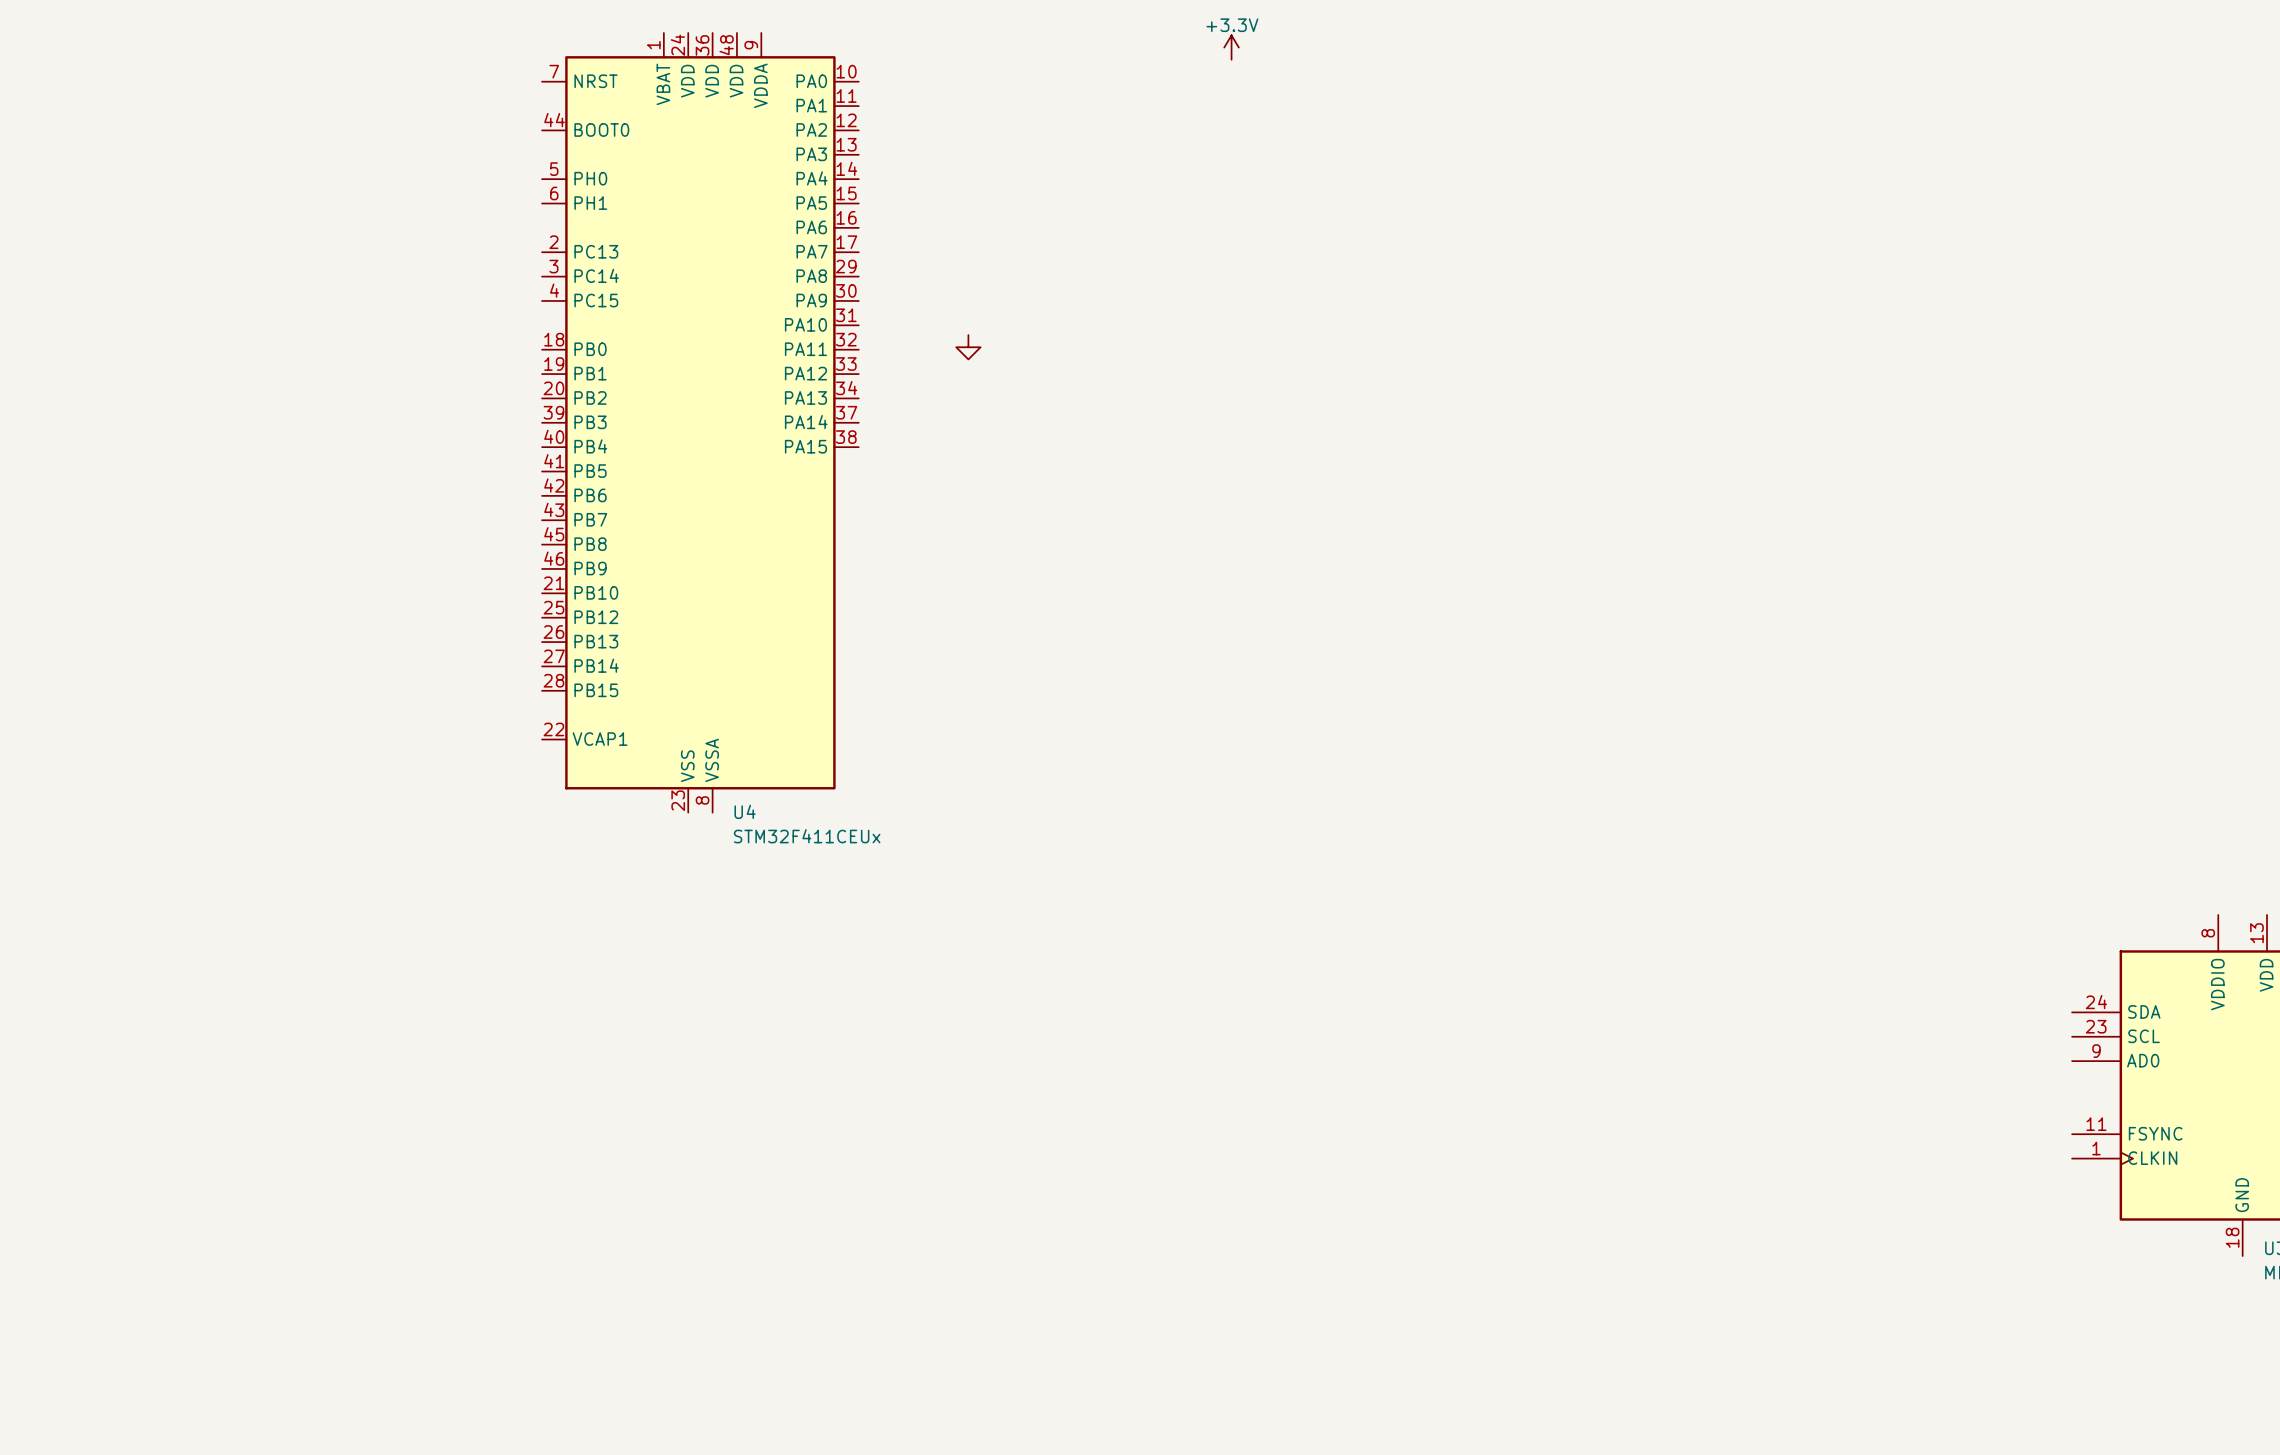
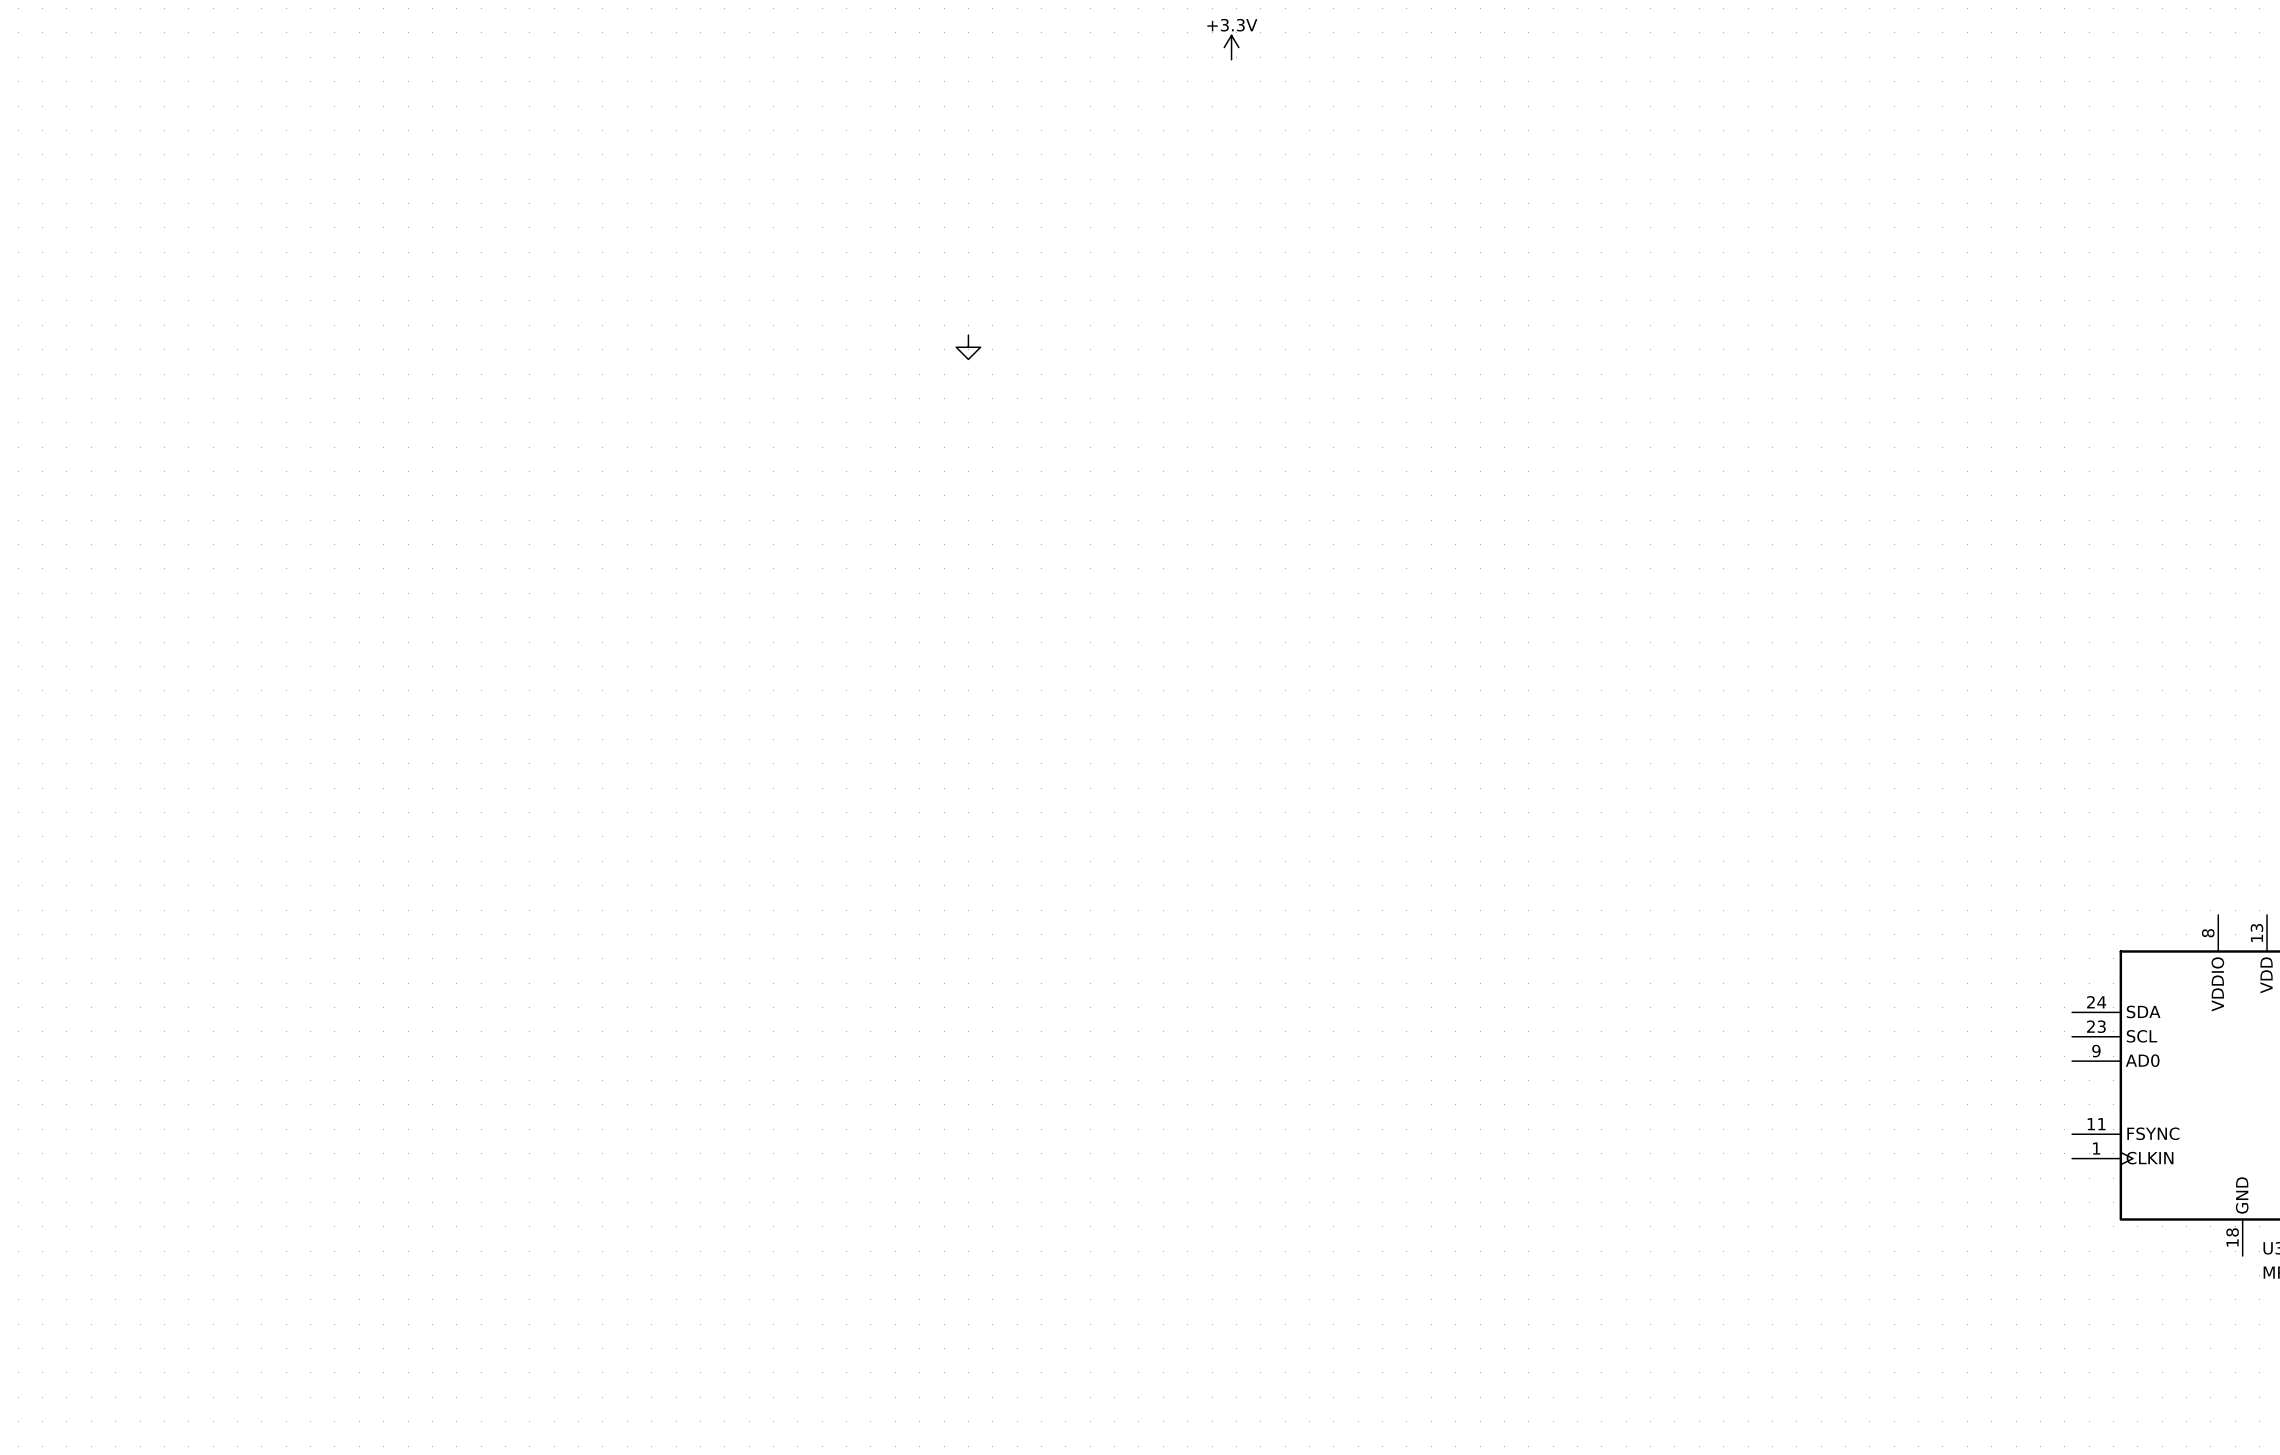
U4: STM32F411CEUx (700, 422) -> none

